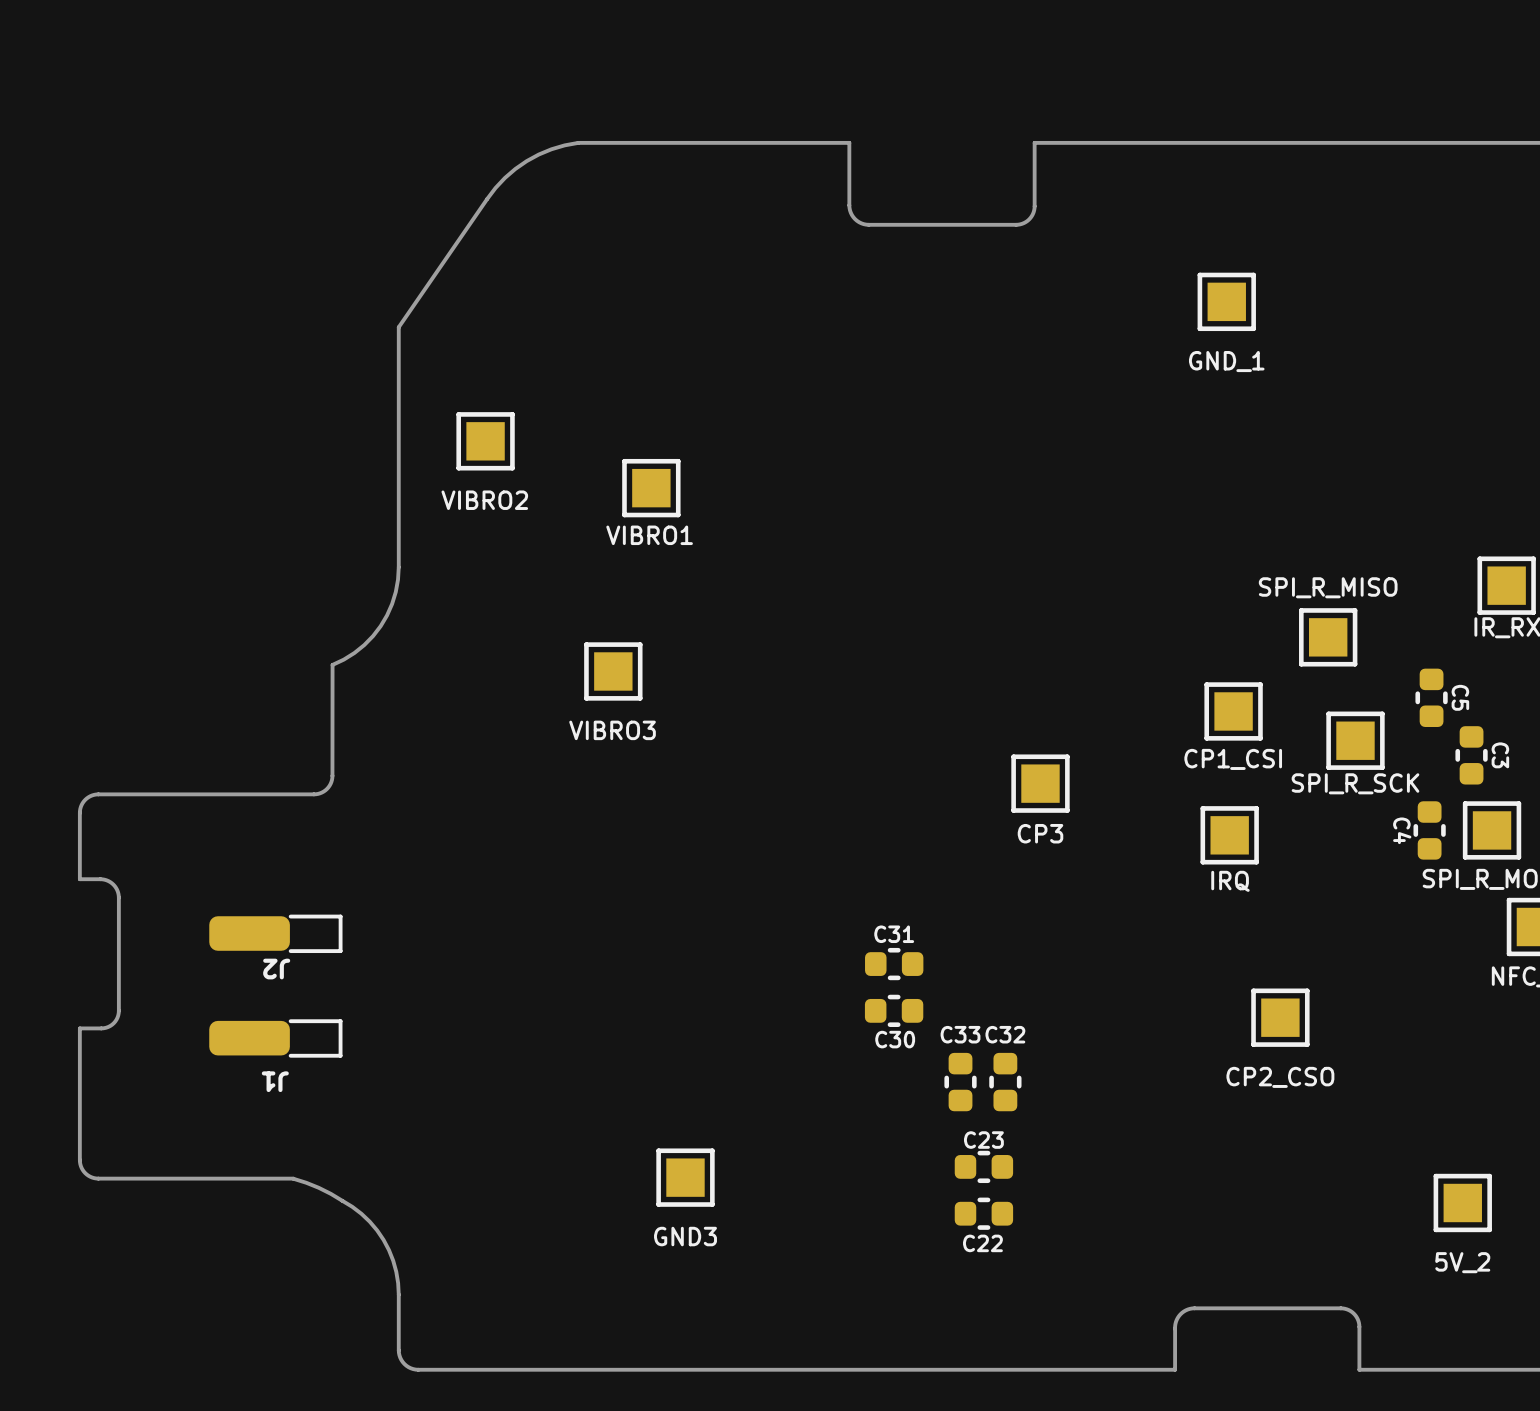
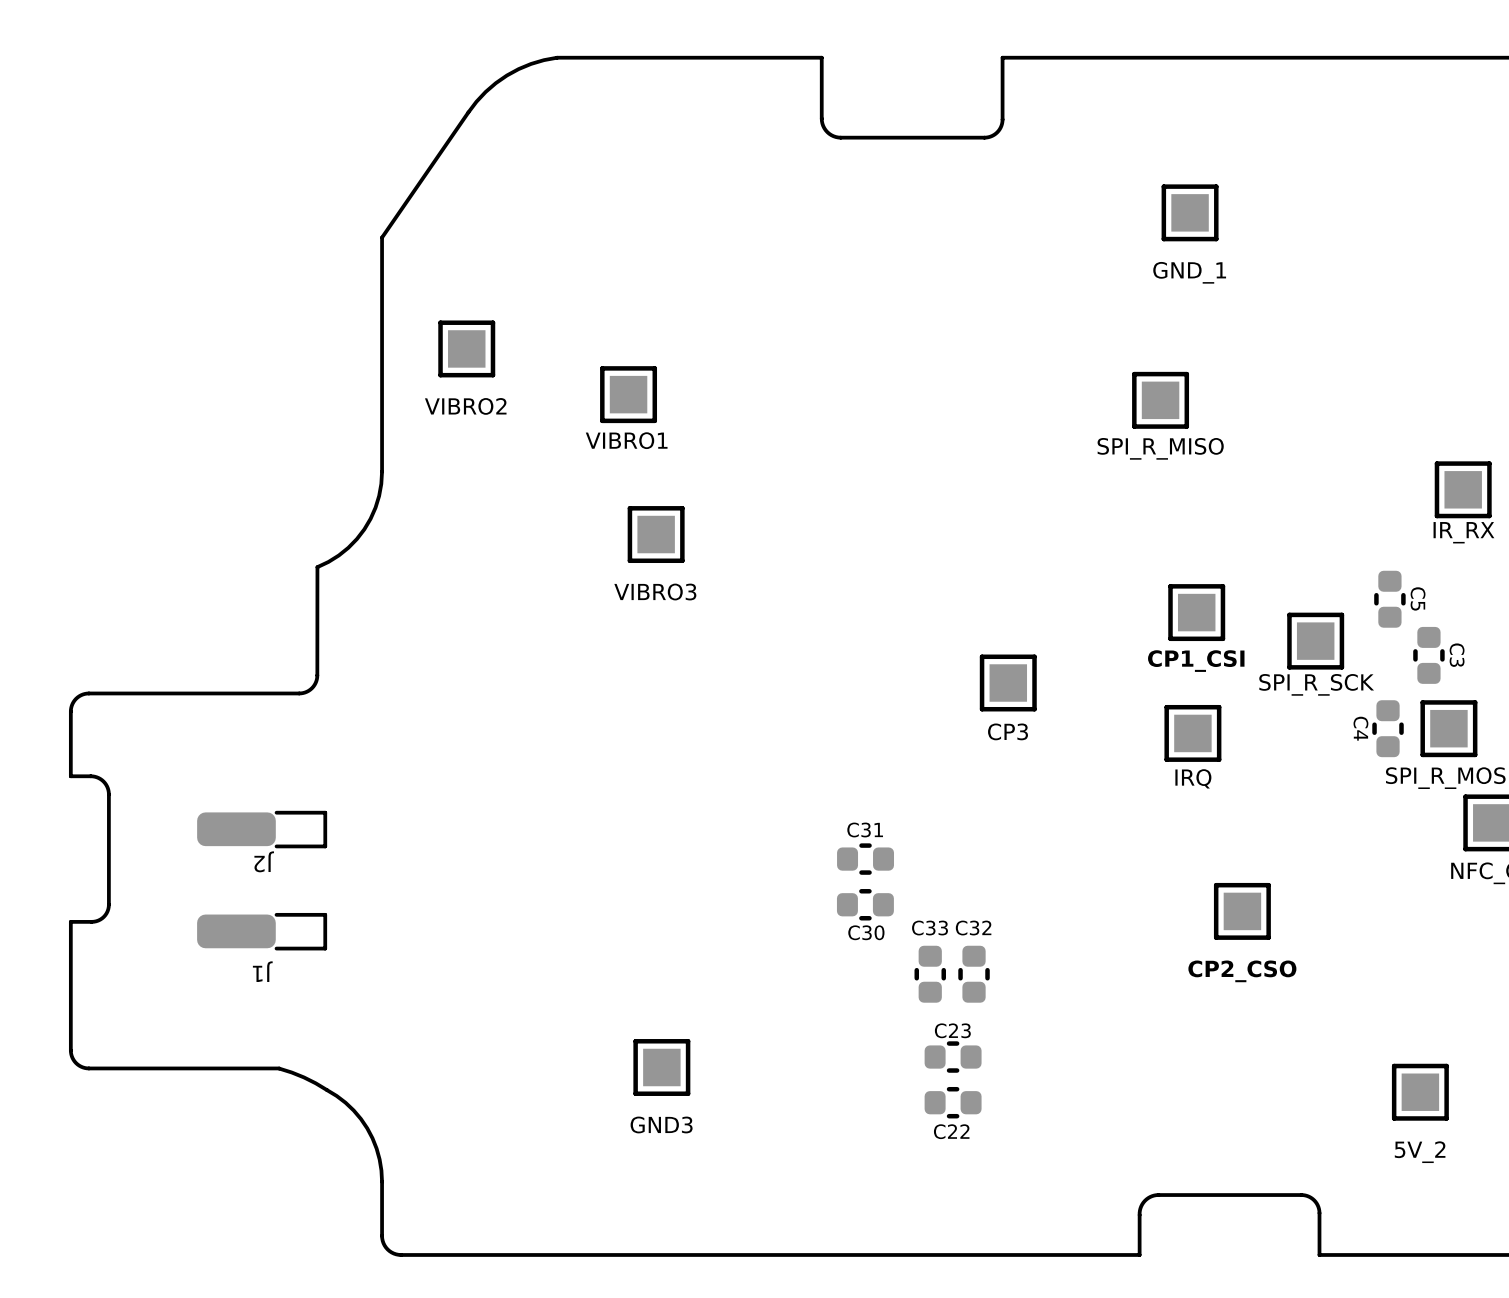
part value position: SPI_R_MISO (1328, 587) -> SPI_R_MISO (1160, 448)
part position: (1328, 637) -> (1160, 400)
part position: (613, 671) -> (656, 534)

